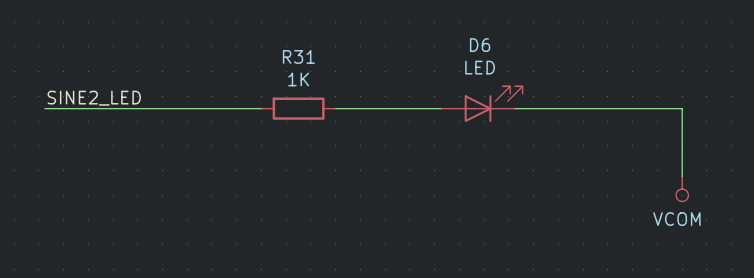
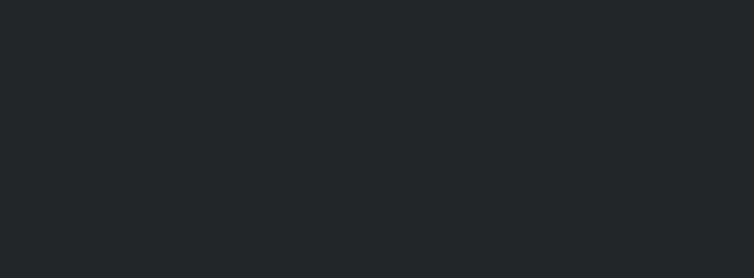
label: SINE2_LED (94, 98) -> none
D6: LED (481, 104) -> none
wire: (44, 108) (261, 108) -> none
R31: 1K (298, 108) -> none
wire: (335, 108) (440, 108) -> none
wire: (515, 108) (682, 108) (682, 176) -> none
power symbol: VCOM (682, 189) -> none

